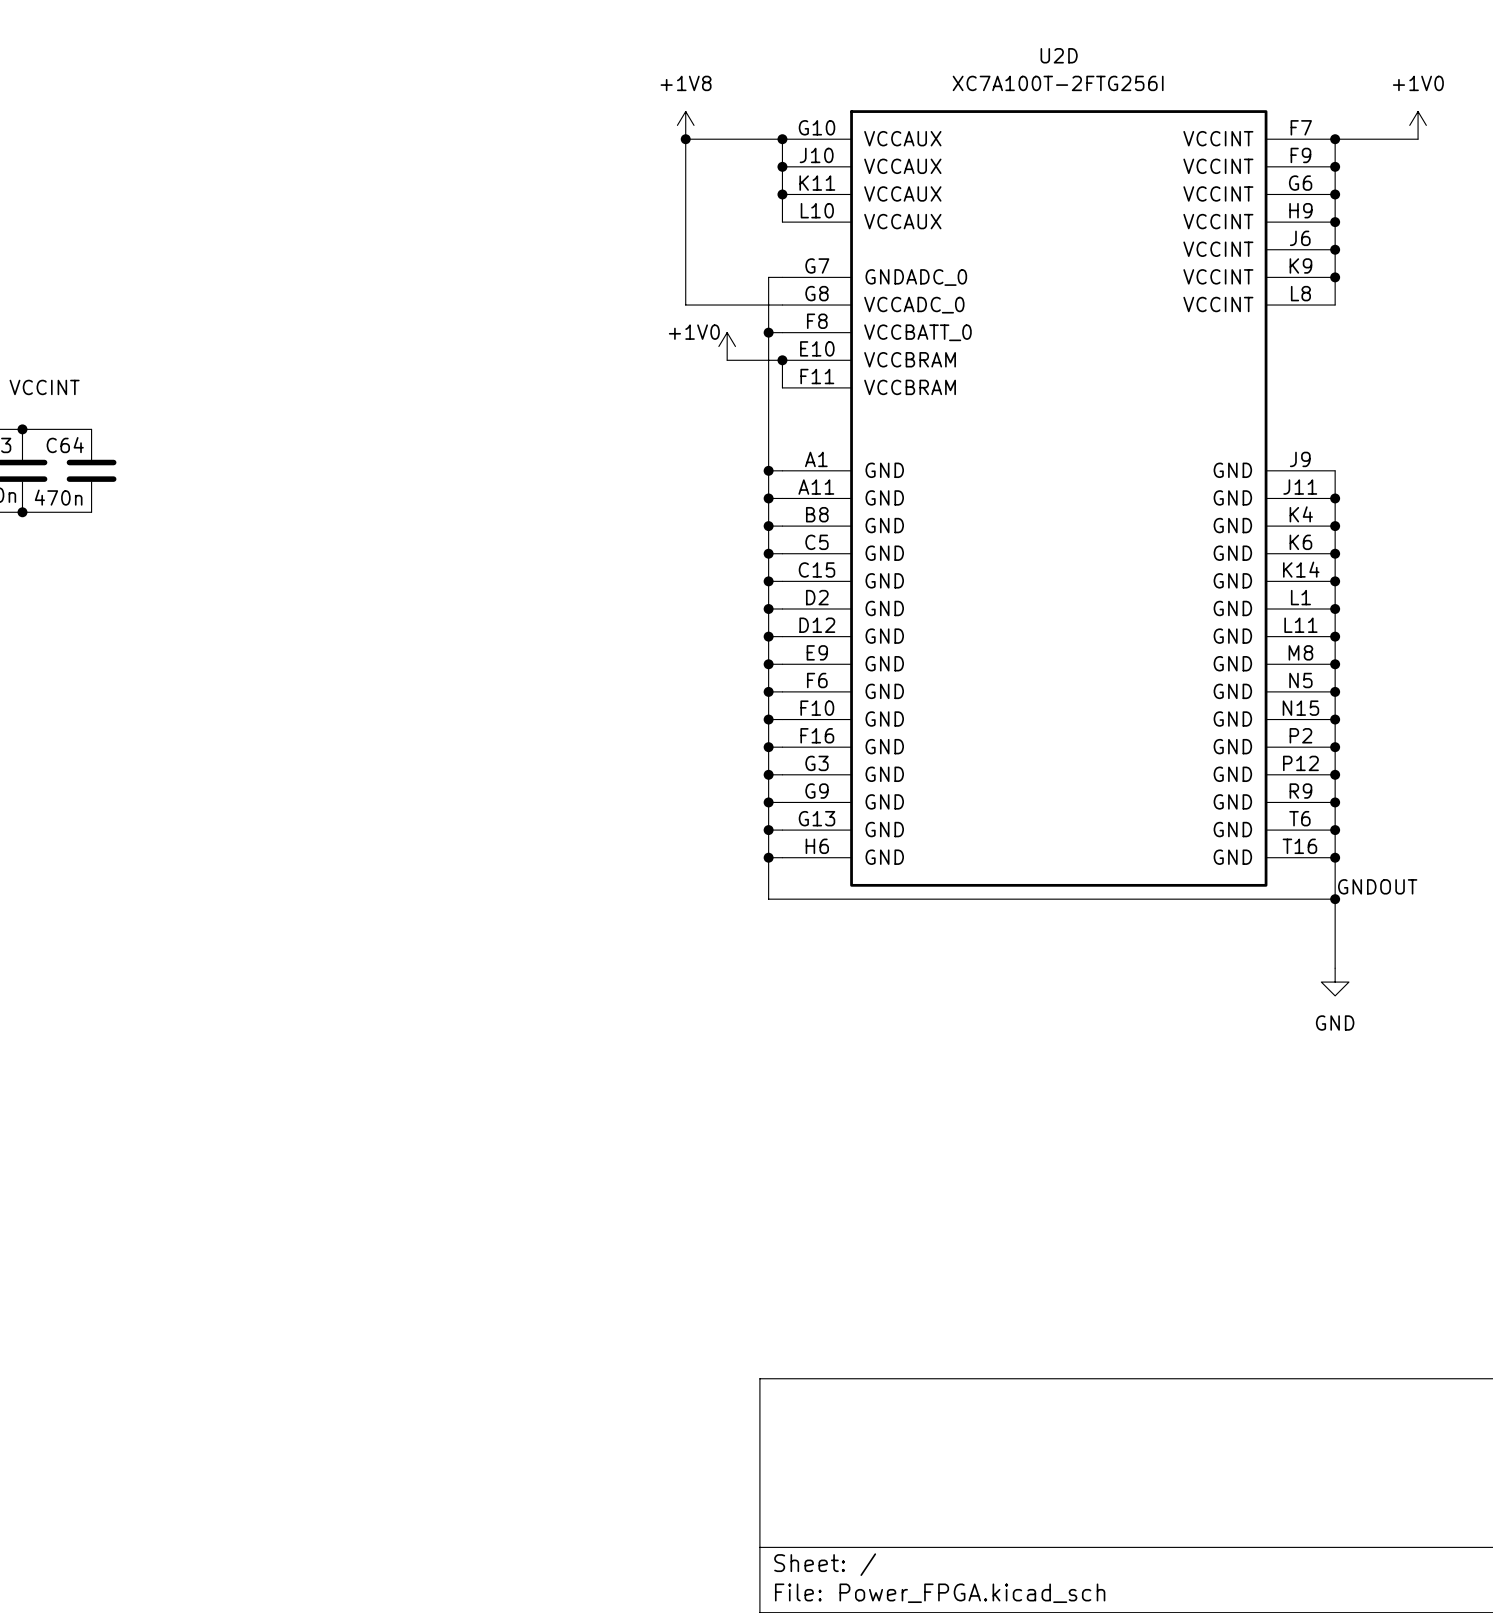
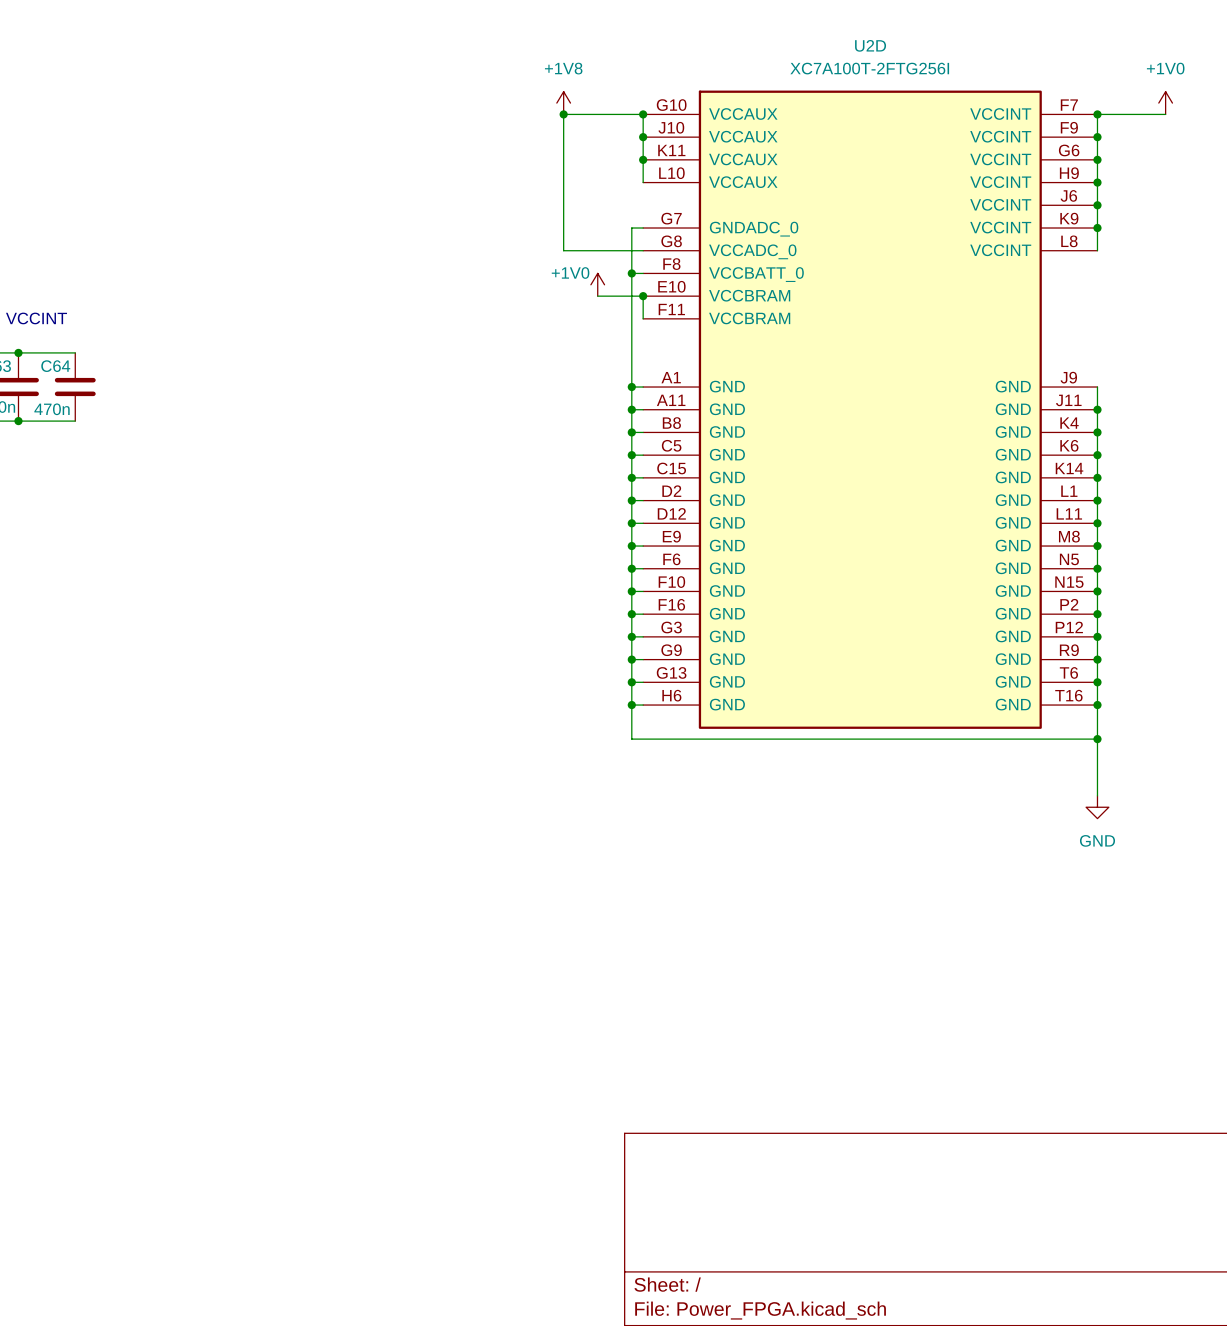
label: GNDOUT (1377, 886) -> none

